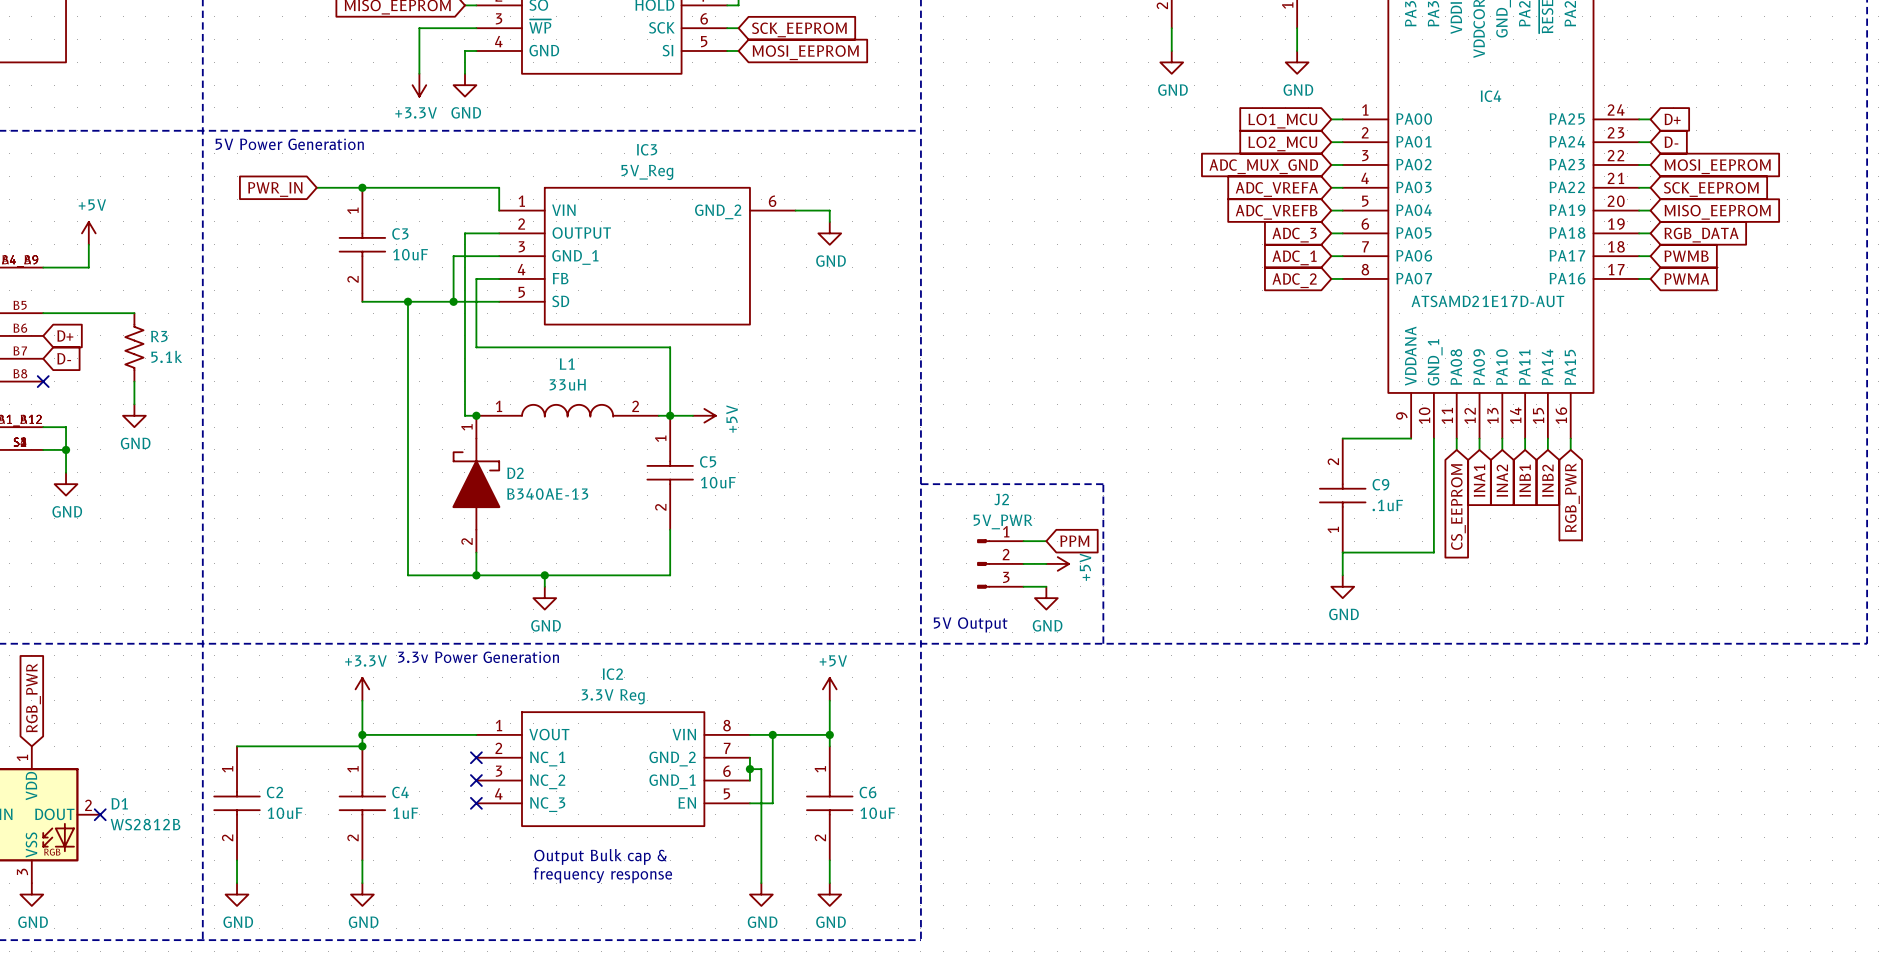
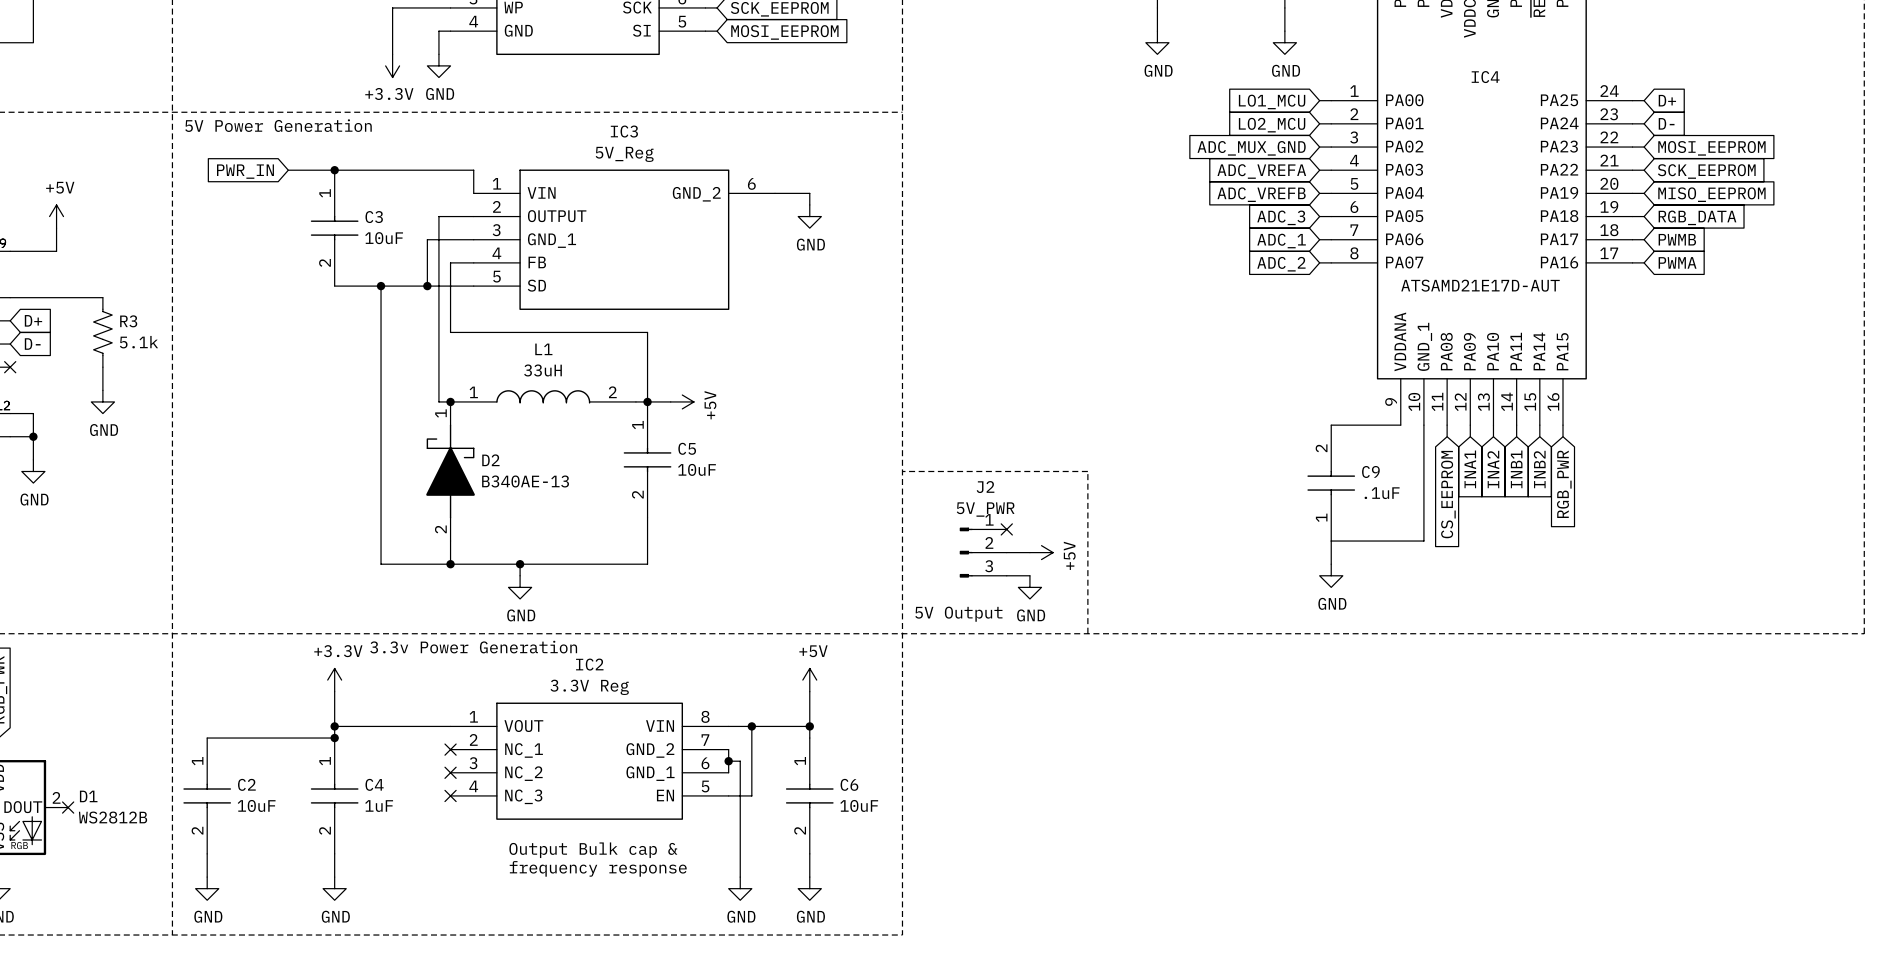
wire: (1023, 541) (1046, 541) -> none
no-connect mark: none -> (1006, 529)
global label: PPM (1074, 541) -> none

